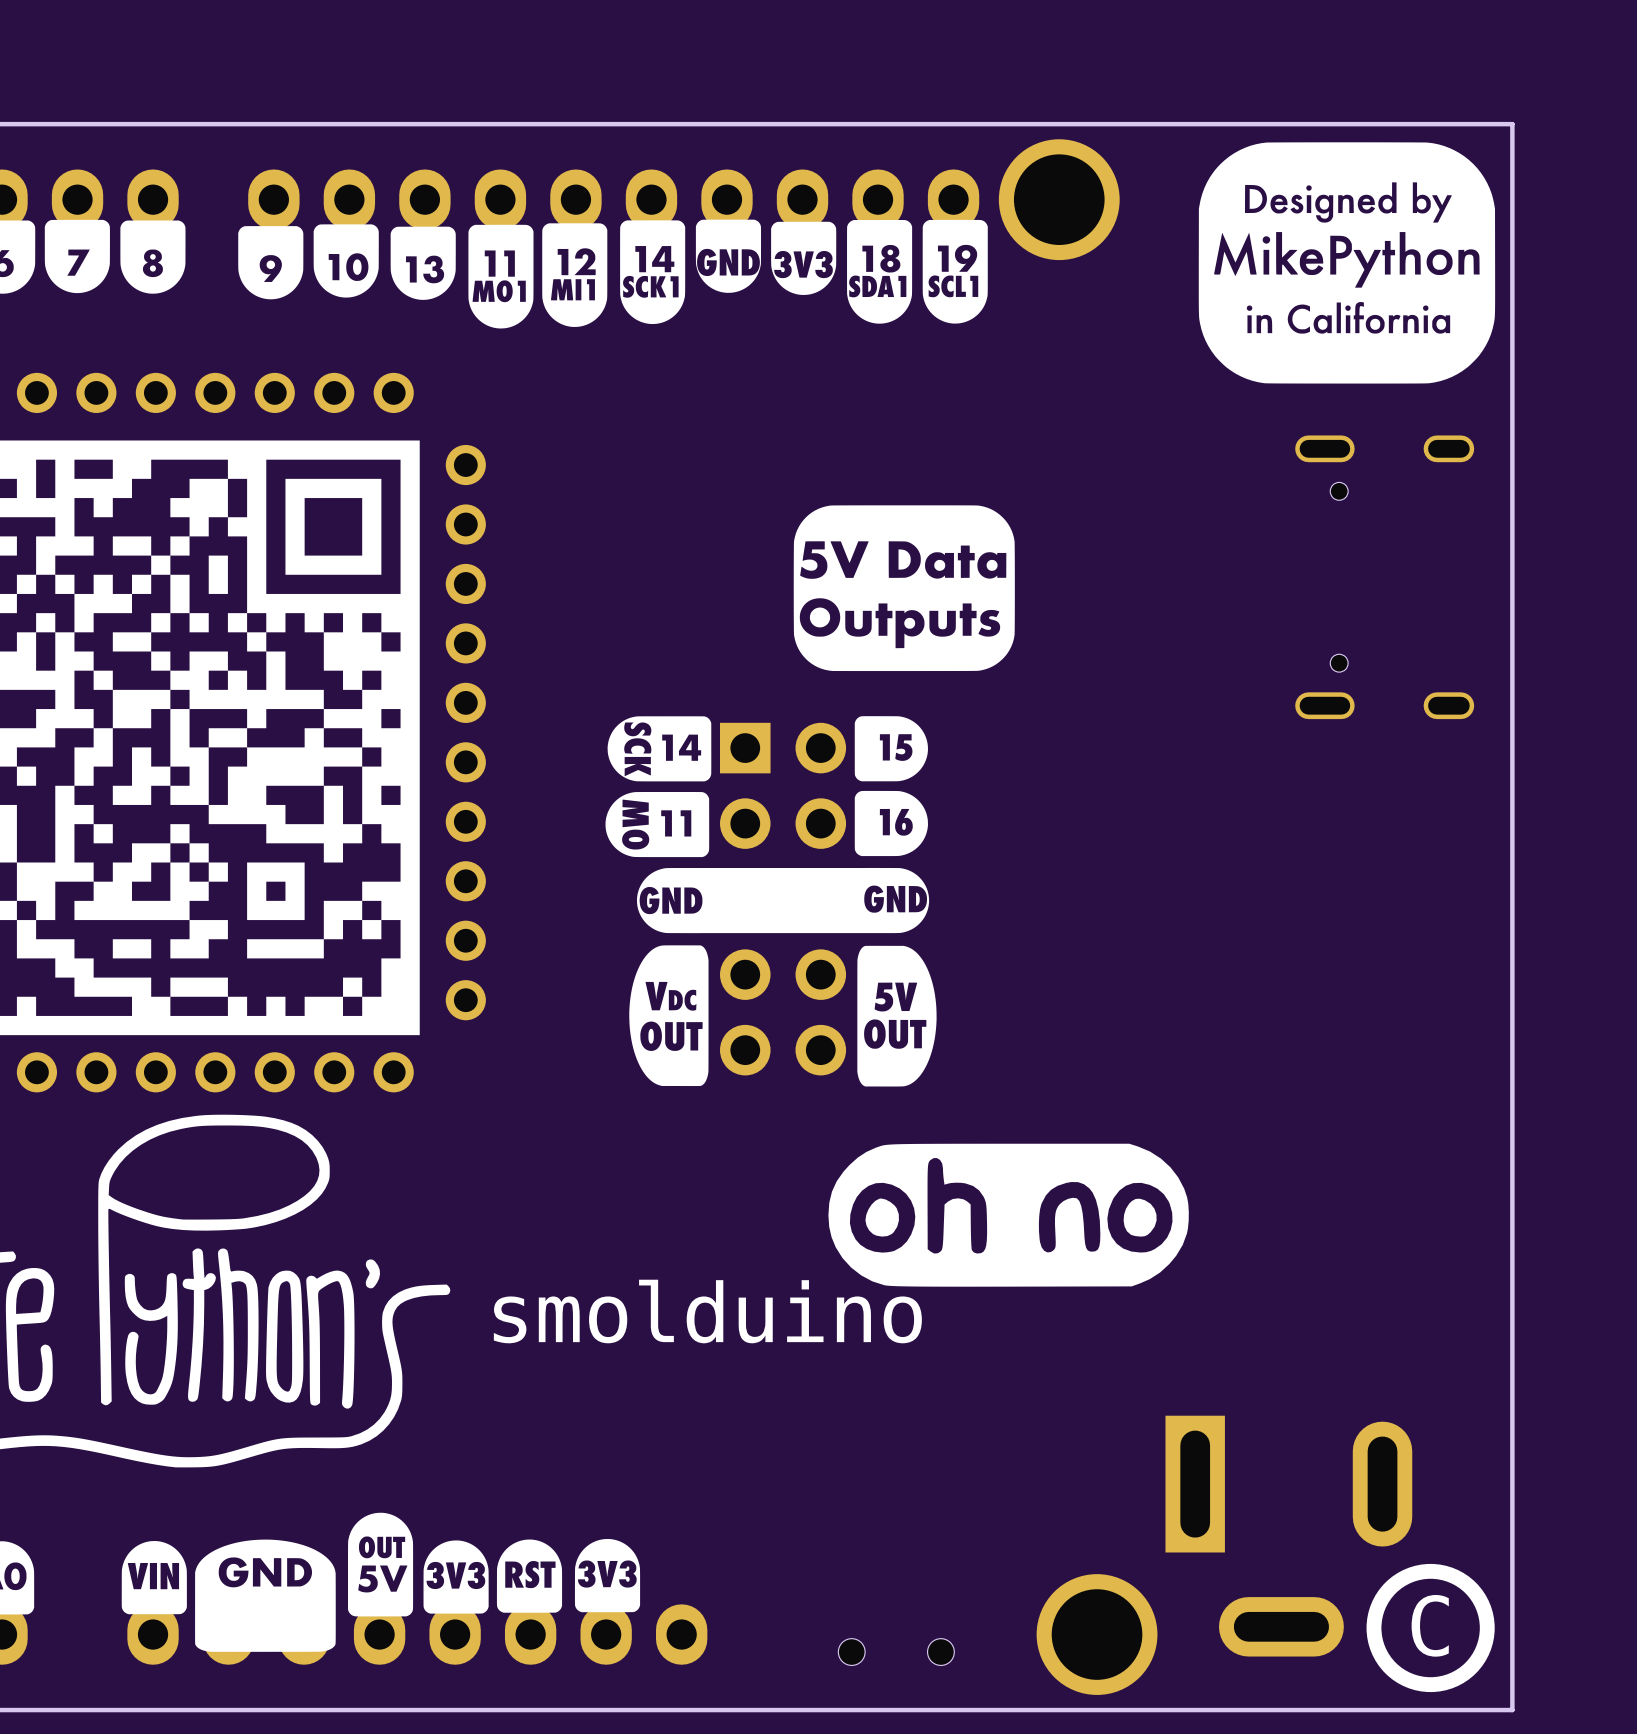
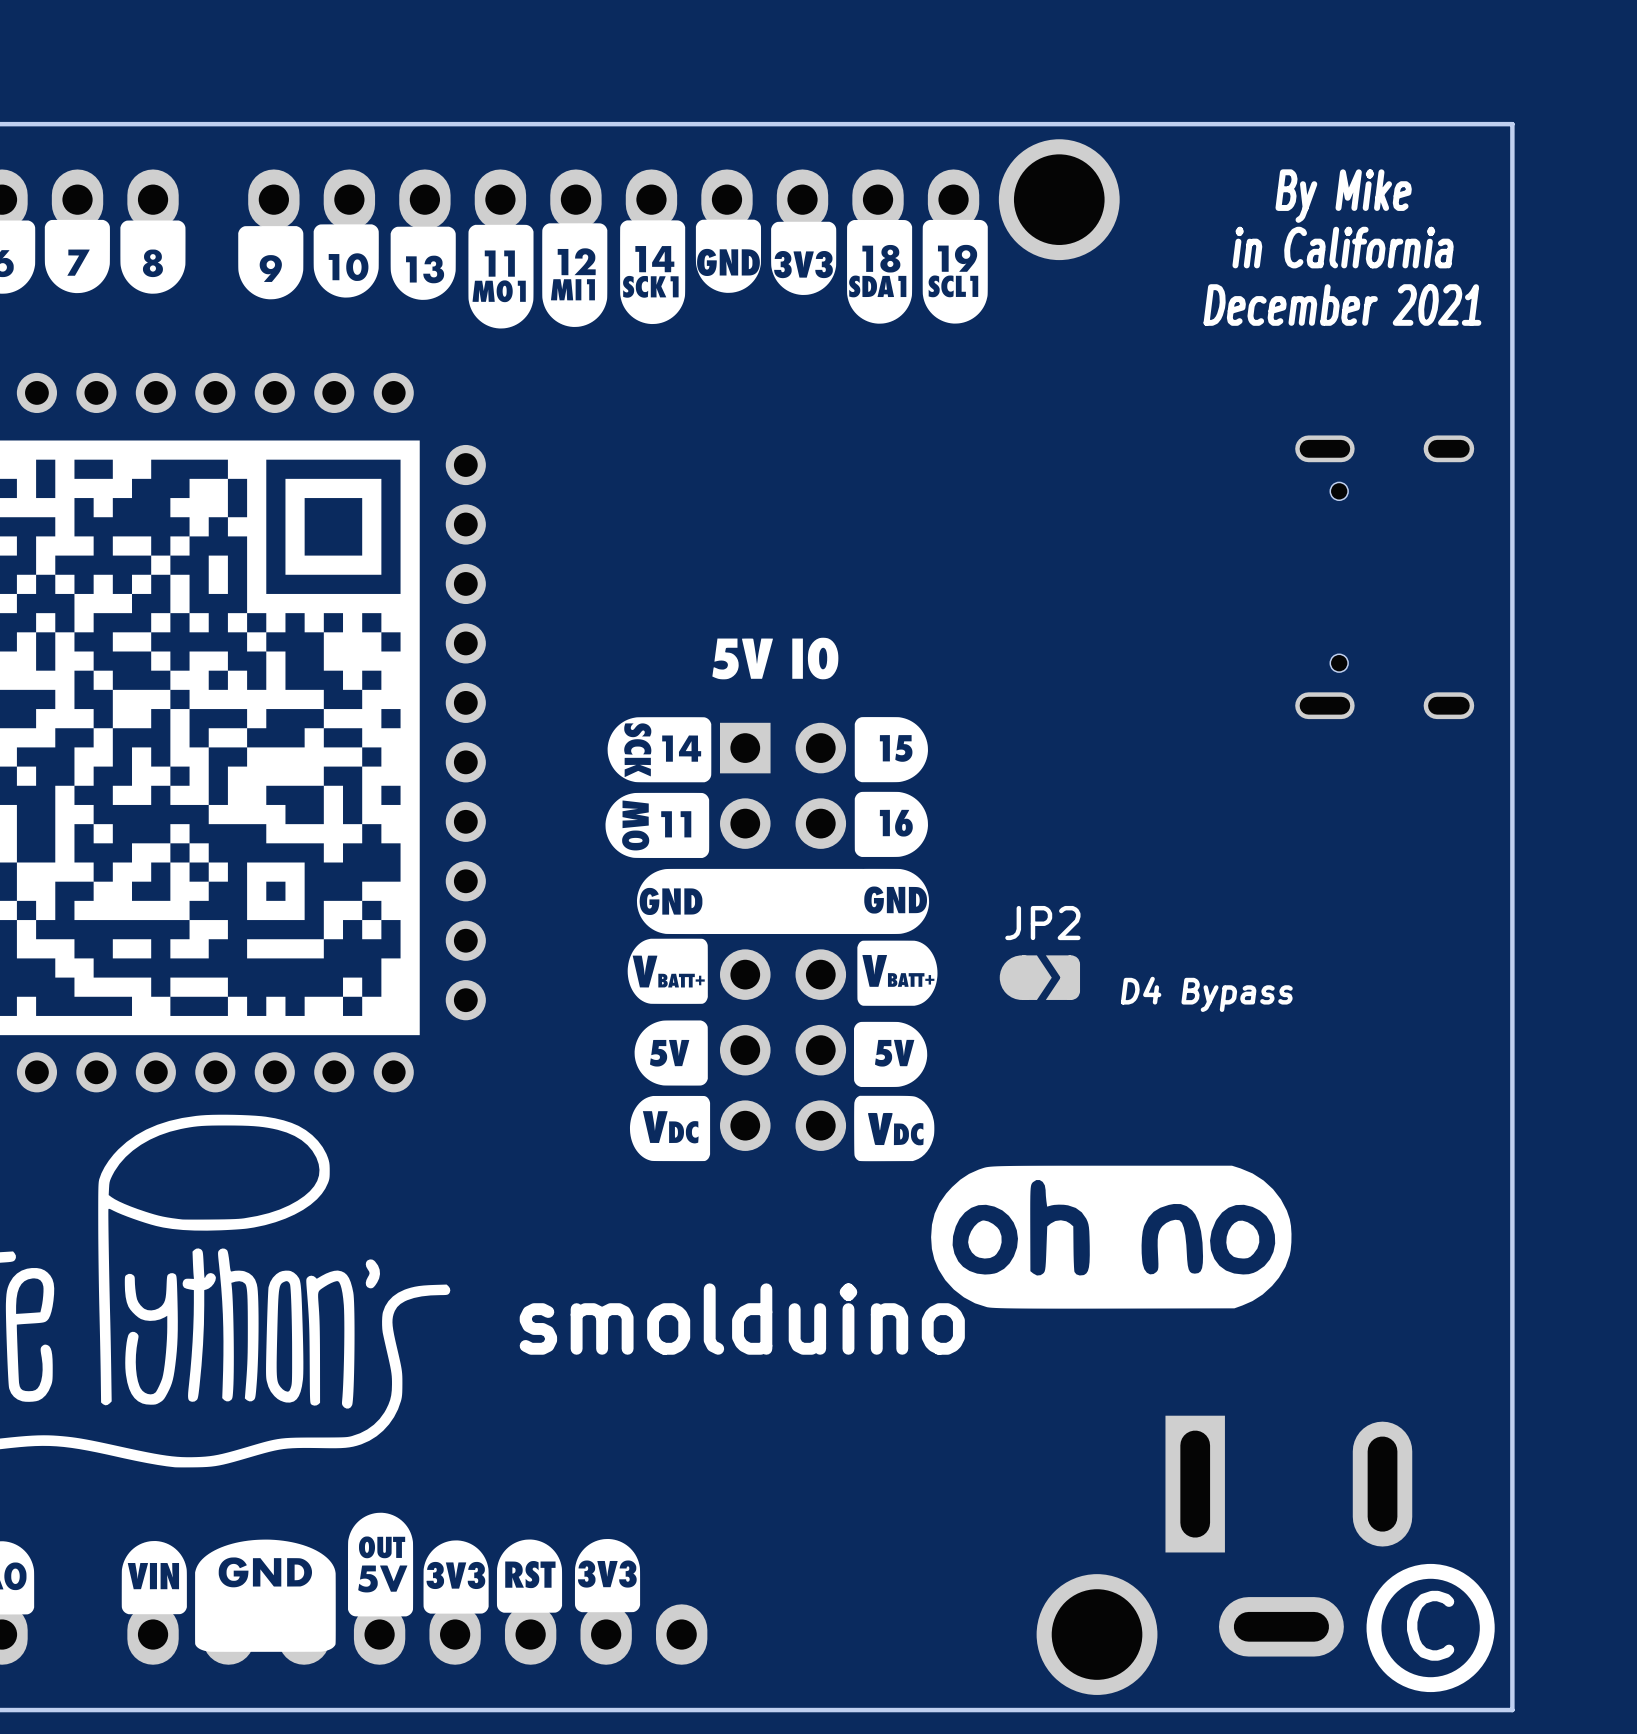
drawing: [1198, 142, 1496, 384] -> none
text: none -> By Mike (1343, 196)
text: none -> in California (1343, 247)
text: none -> December 2021 (1342, 305)
drawing: [793, 505, 1015, 672] -> none
drawing: none -> [712, 637, 839, 680]
part: (771, 901) -> none
part: none -> (771, 940)
JP2: none -> (1039, 977)
drawing position: (1008, 1215) -> (1111, 1237)
text position: smolduino (707, 1311) -> smolduino (742, 1319)
part: (896, 1652) -> none

